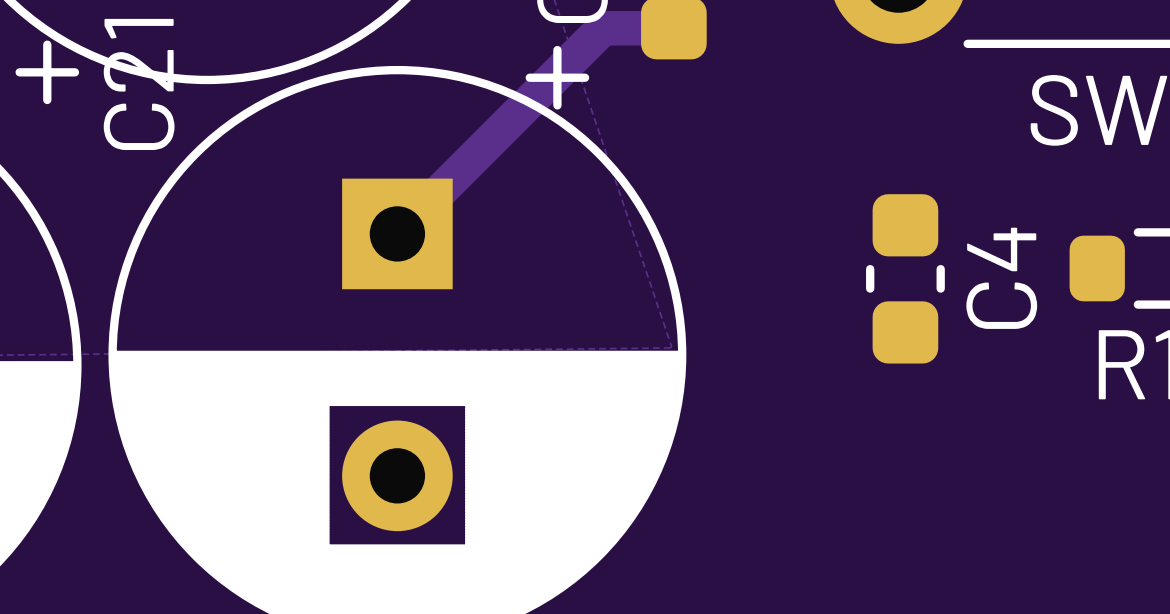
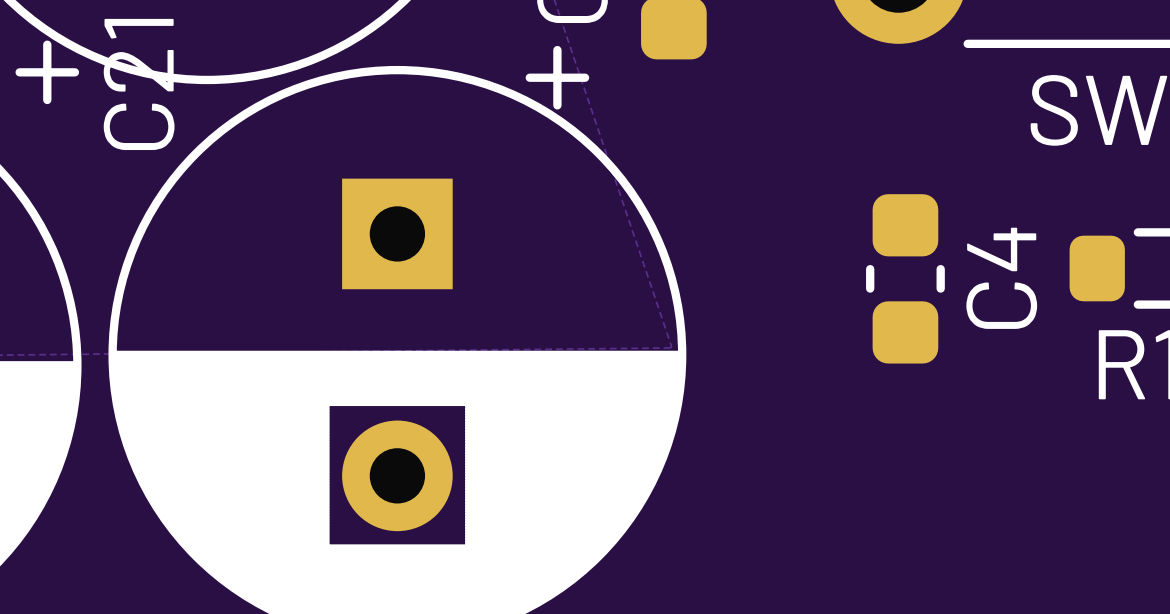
track: (673, 28) (603, 28) (397, 233) -> none

